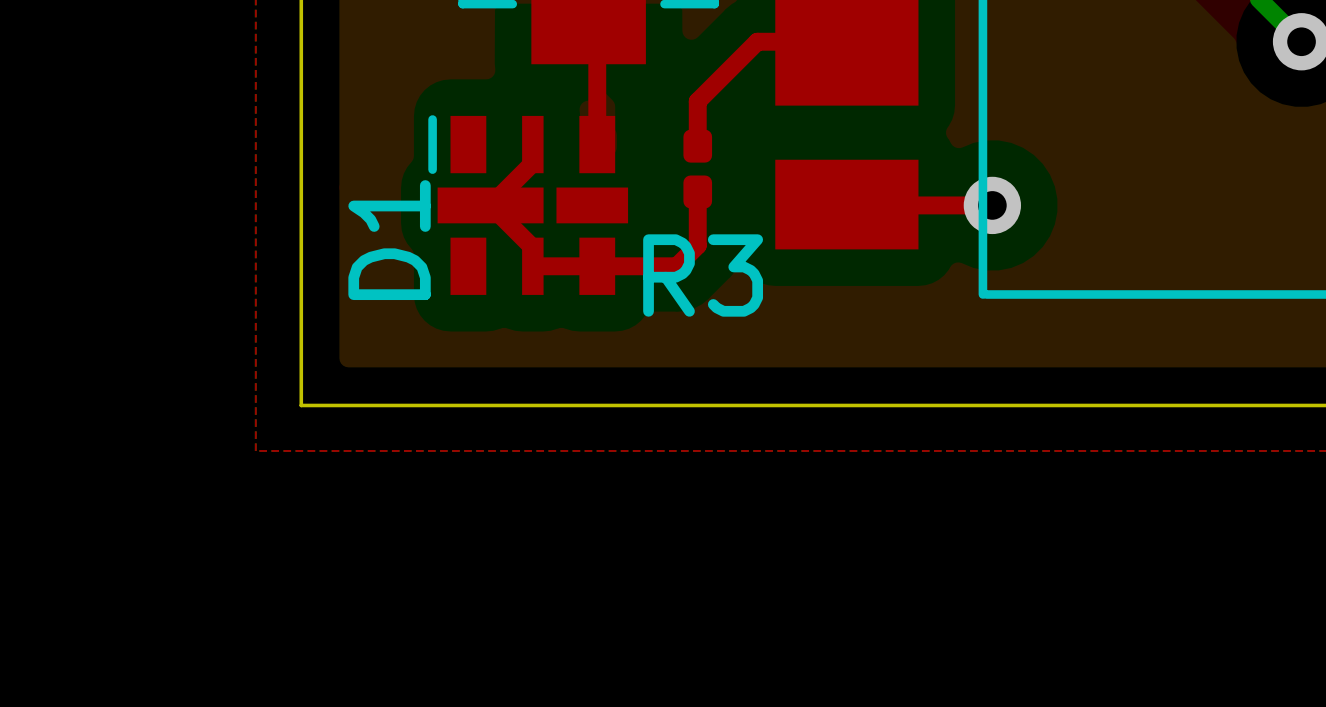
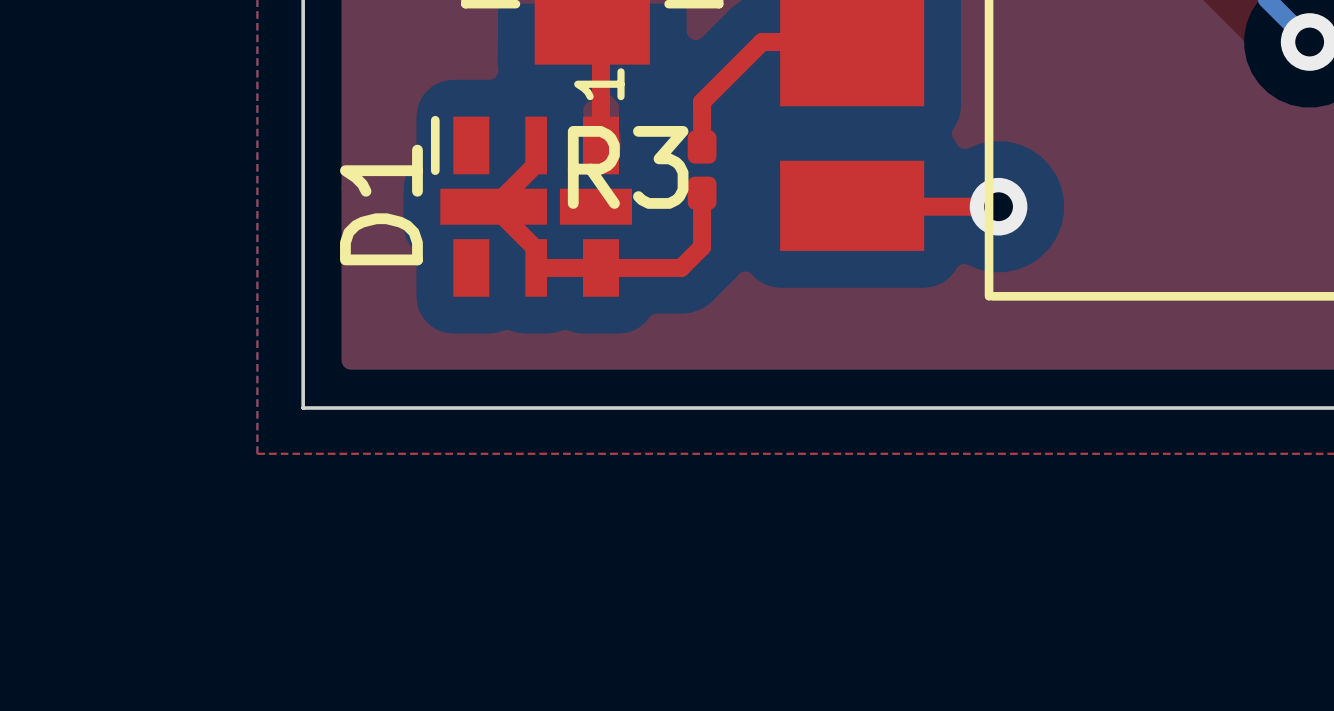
D1 text: none -> 1 (599, 84)
D1 name position: D1 (389, 240) -> D1 (381, 204)
R3 name position: R3 (703, 275) -> R3 (628, 167)

